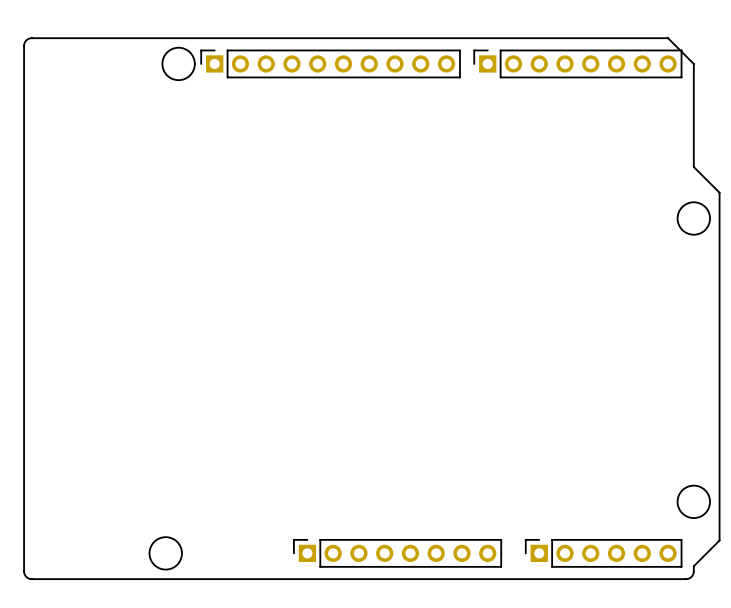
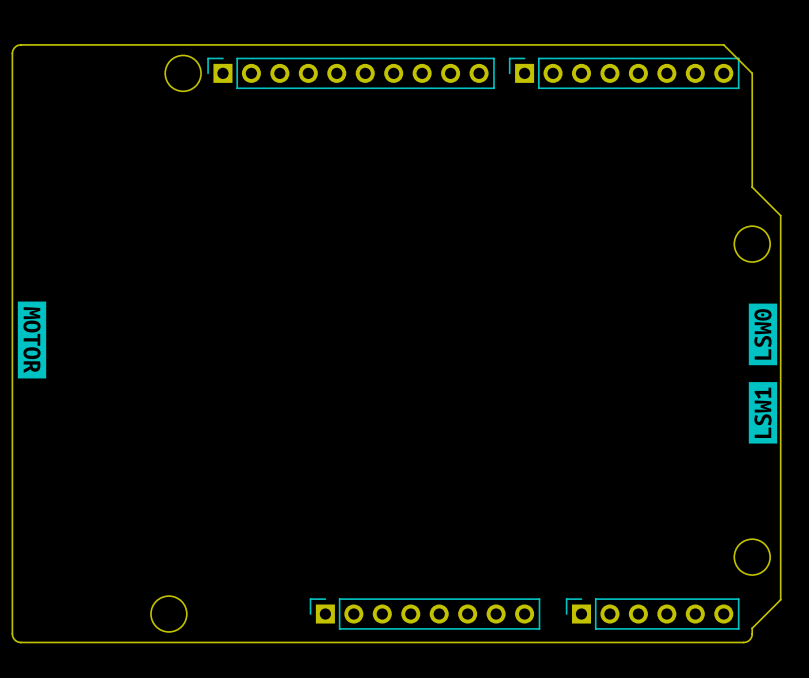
drawing: none -> [17, 301, 47, 379]
drawing: none -> [748, 303, 778, 366]
drawing: none -> [748, 382, 778, 444]

